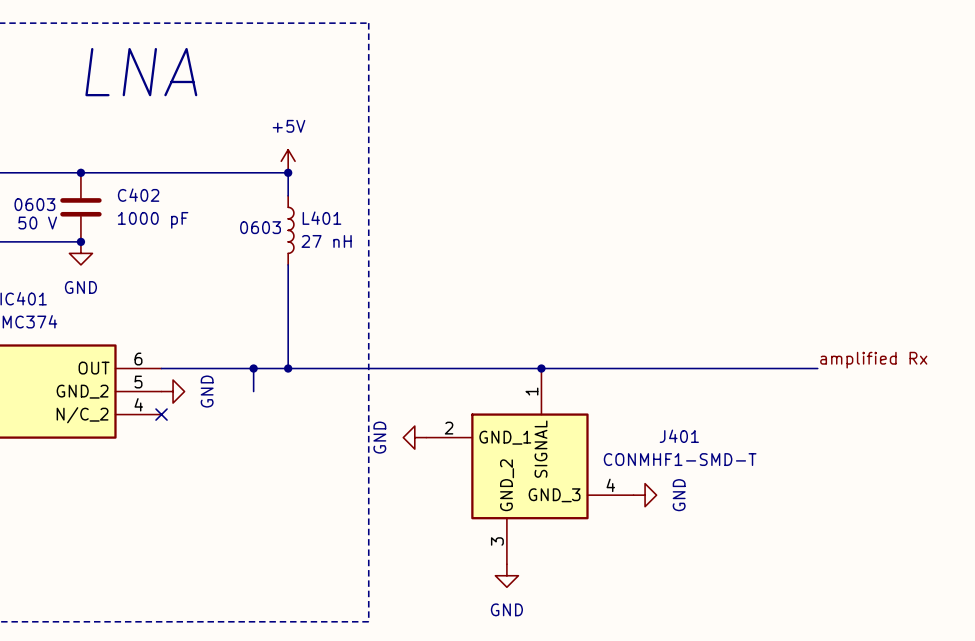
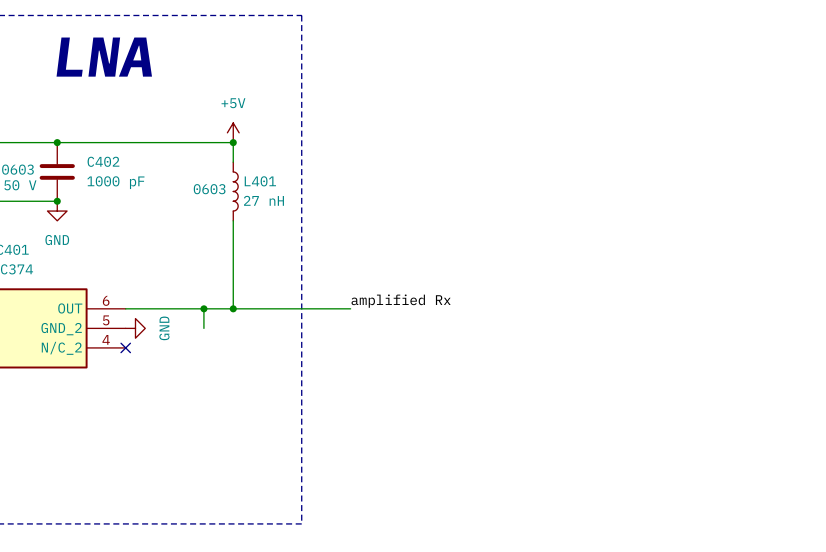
label: none -> amplified Rx (401, 301)
label: amplified Rx (873, 360) -> none
wire: (426, 368) (817, 368) -> none
junction: (541, 368) -> none
power symbol: GND (414, 437) -> none
J401: CONMHF1-SMD-T (529, 466) -> none
power symbol: GND (645, 495) -> none
power symbol: GND (506, 575) -> none

